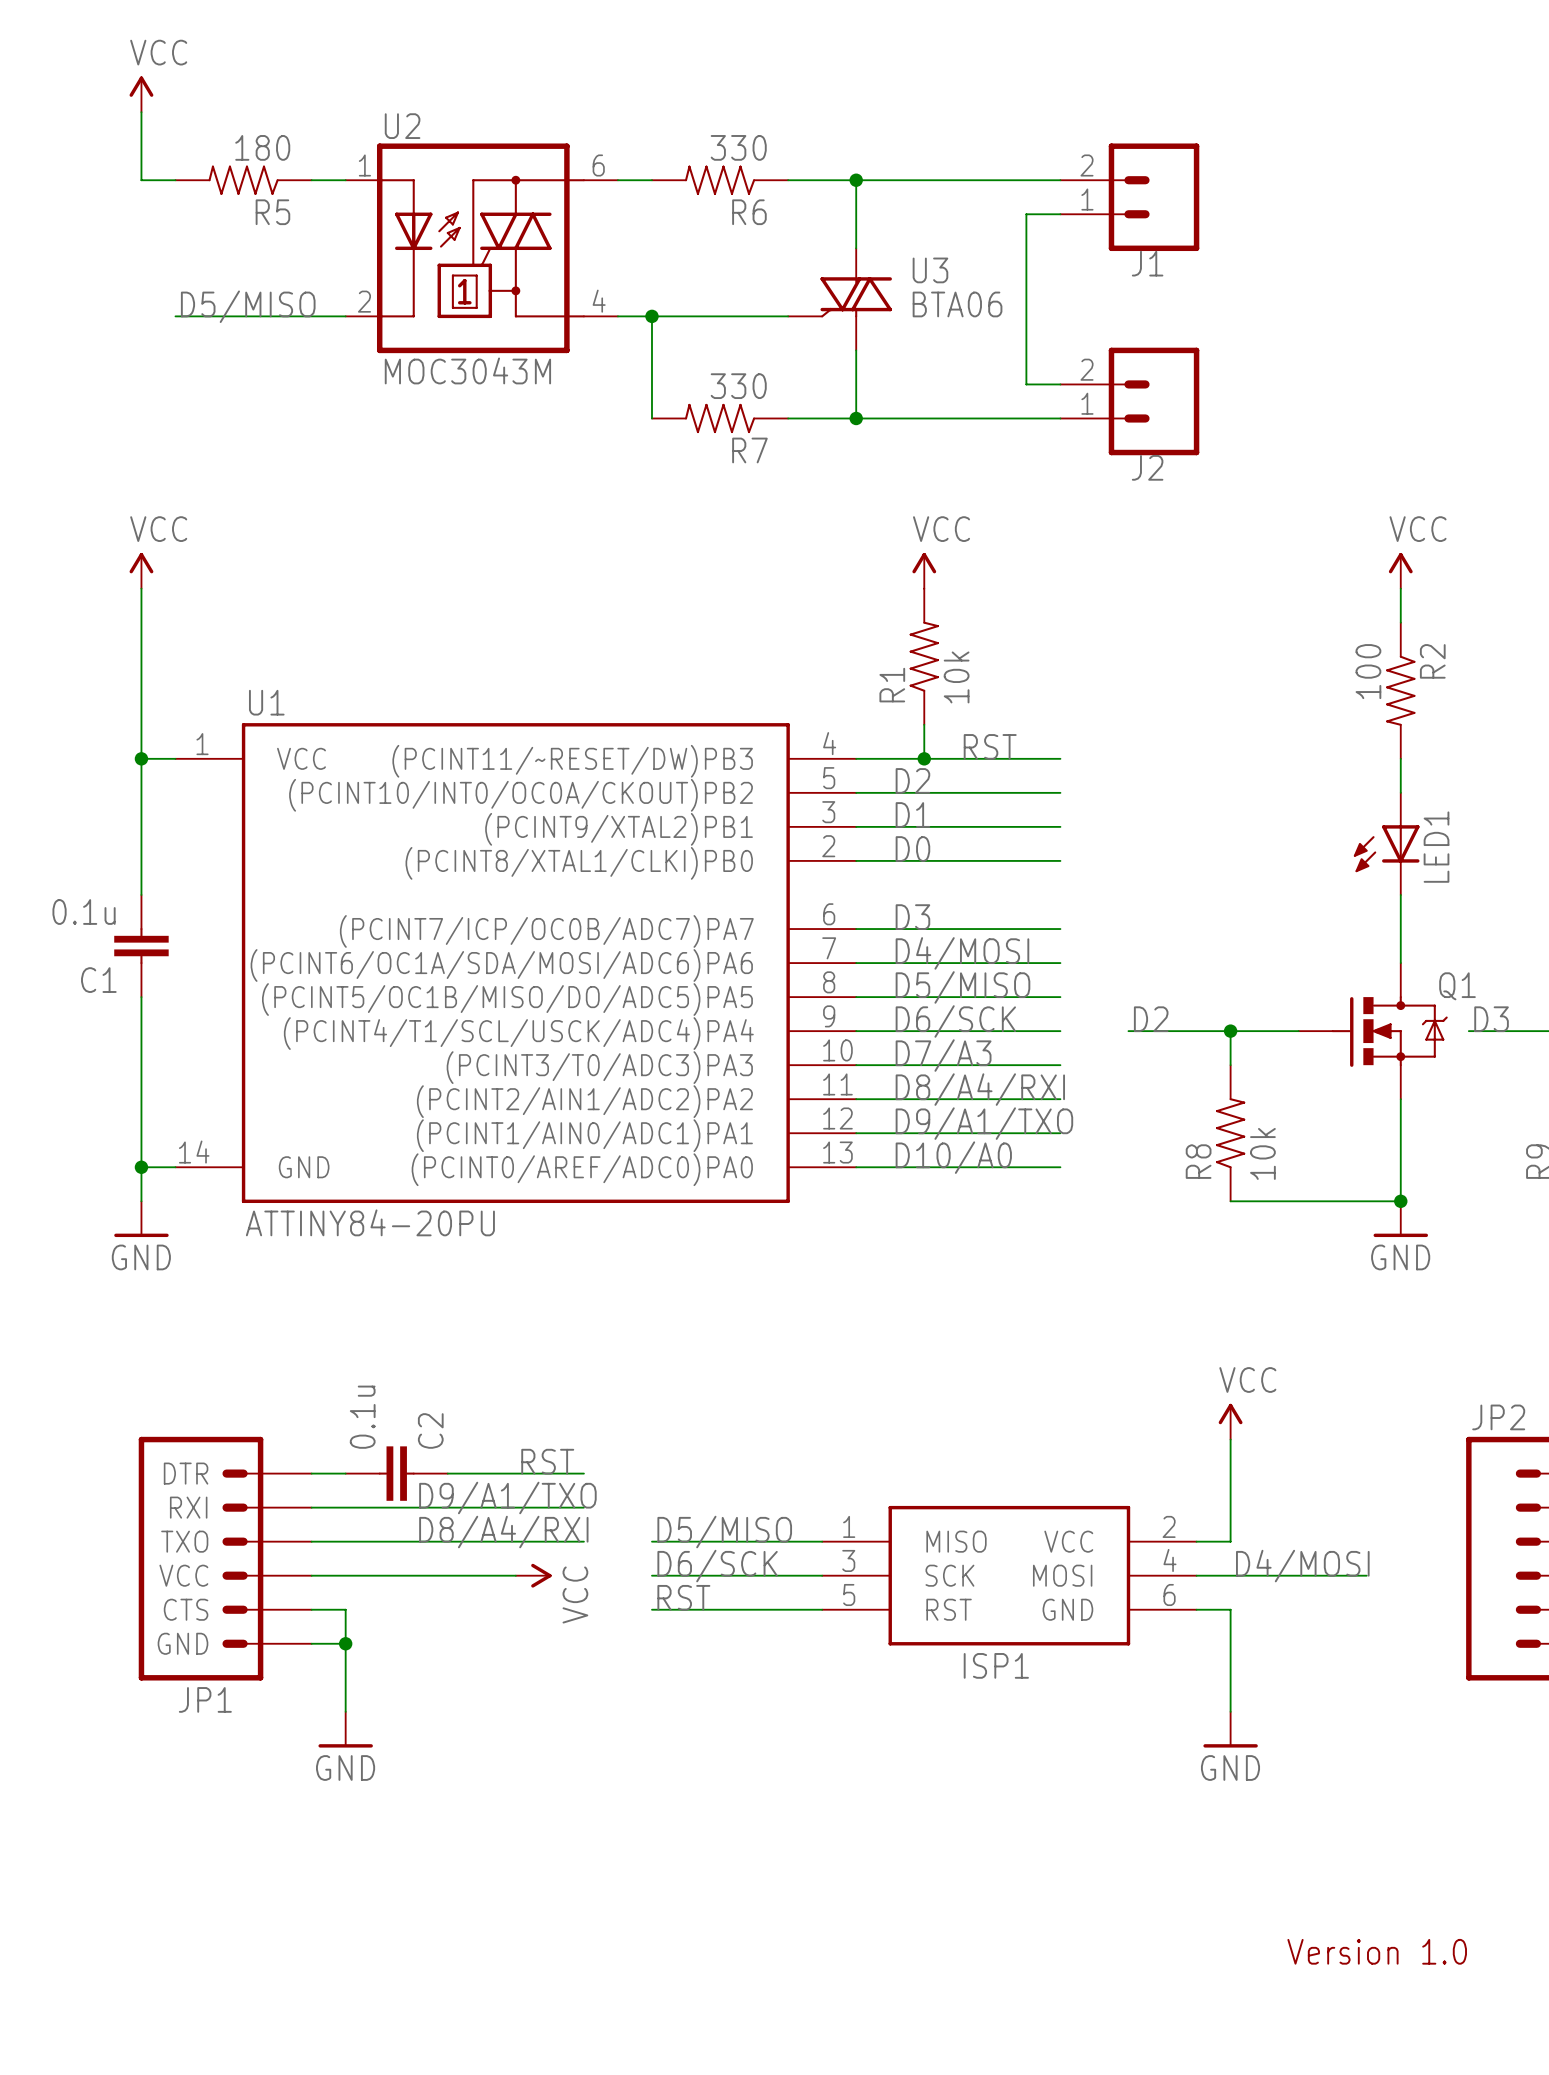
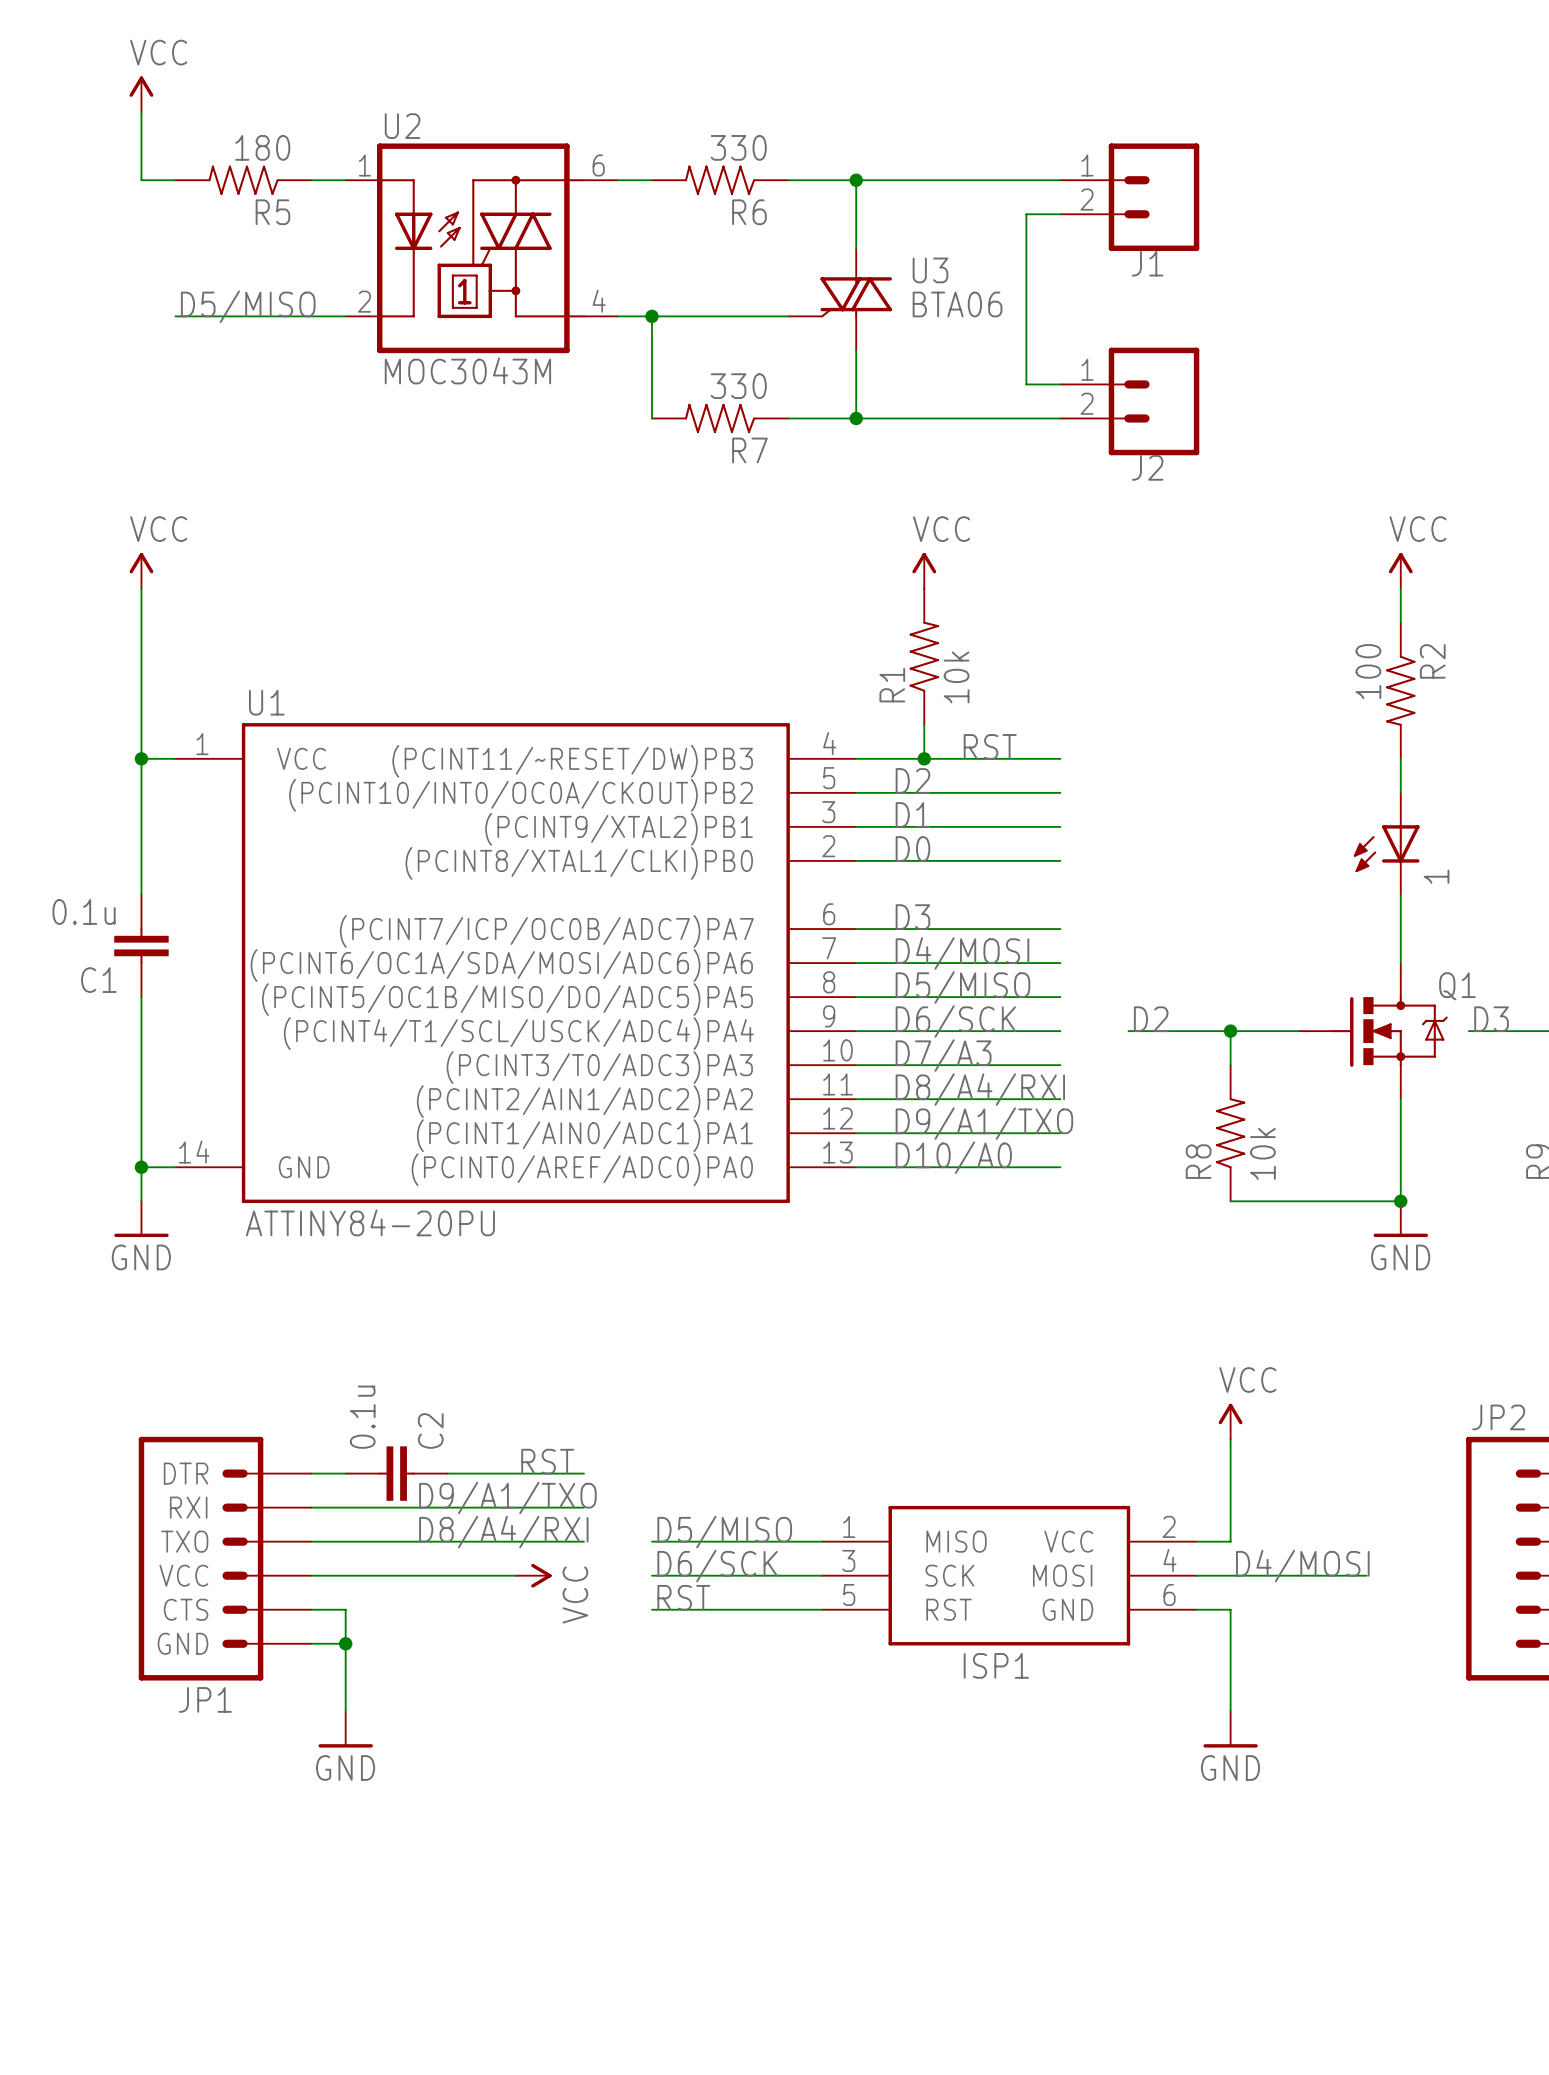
part flip: as is (1154, 197) -> up-down (1154, 197)
part flip: as is (1154, 401) -> up-down (1154, 401)
LED1 name: LED1 (1436, 847) -> 1 (1436, 876)
text: Version 1.0 (1377, 1951) -> none

